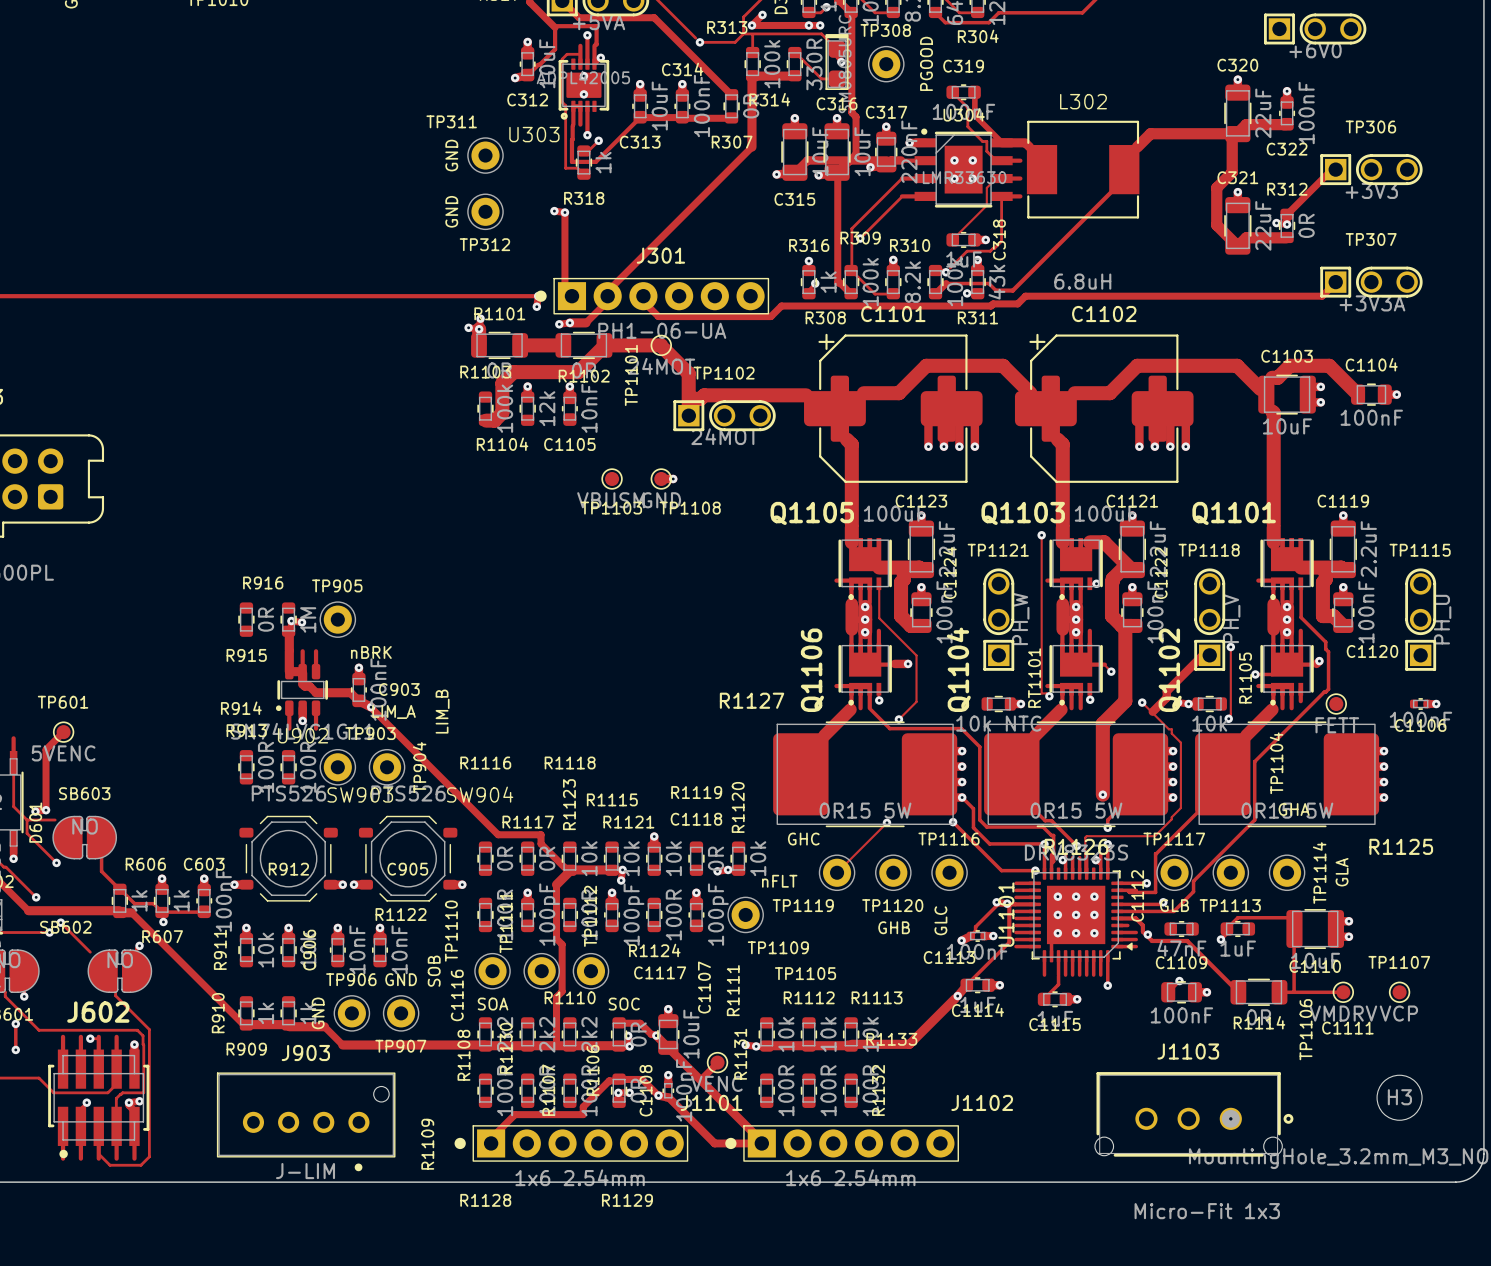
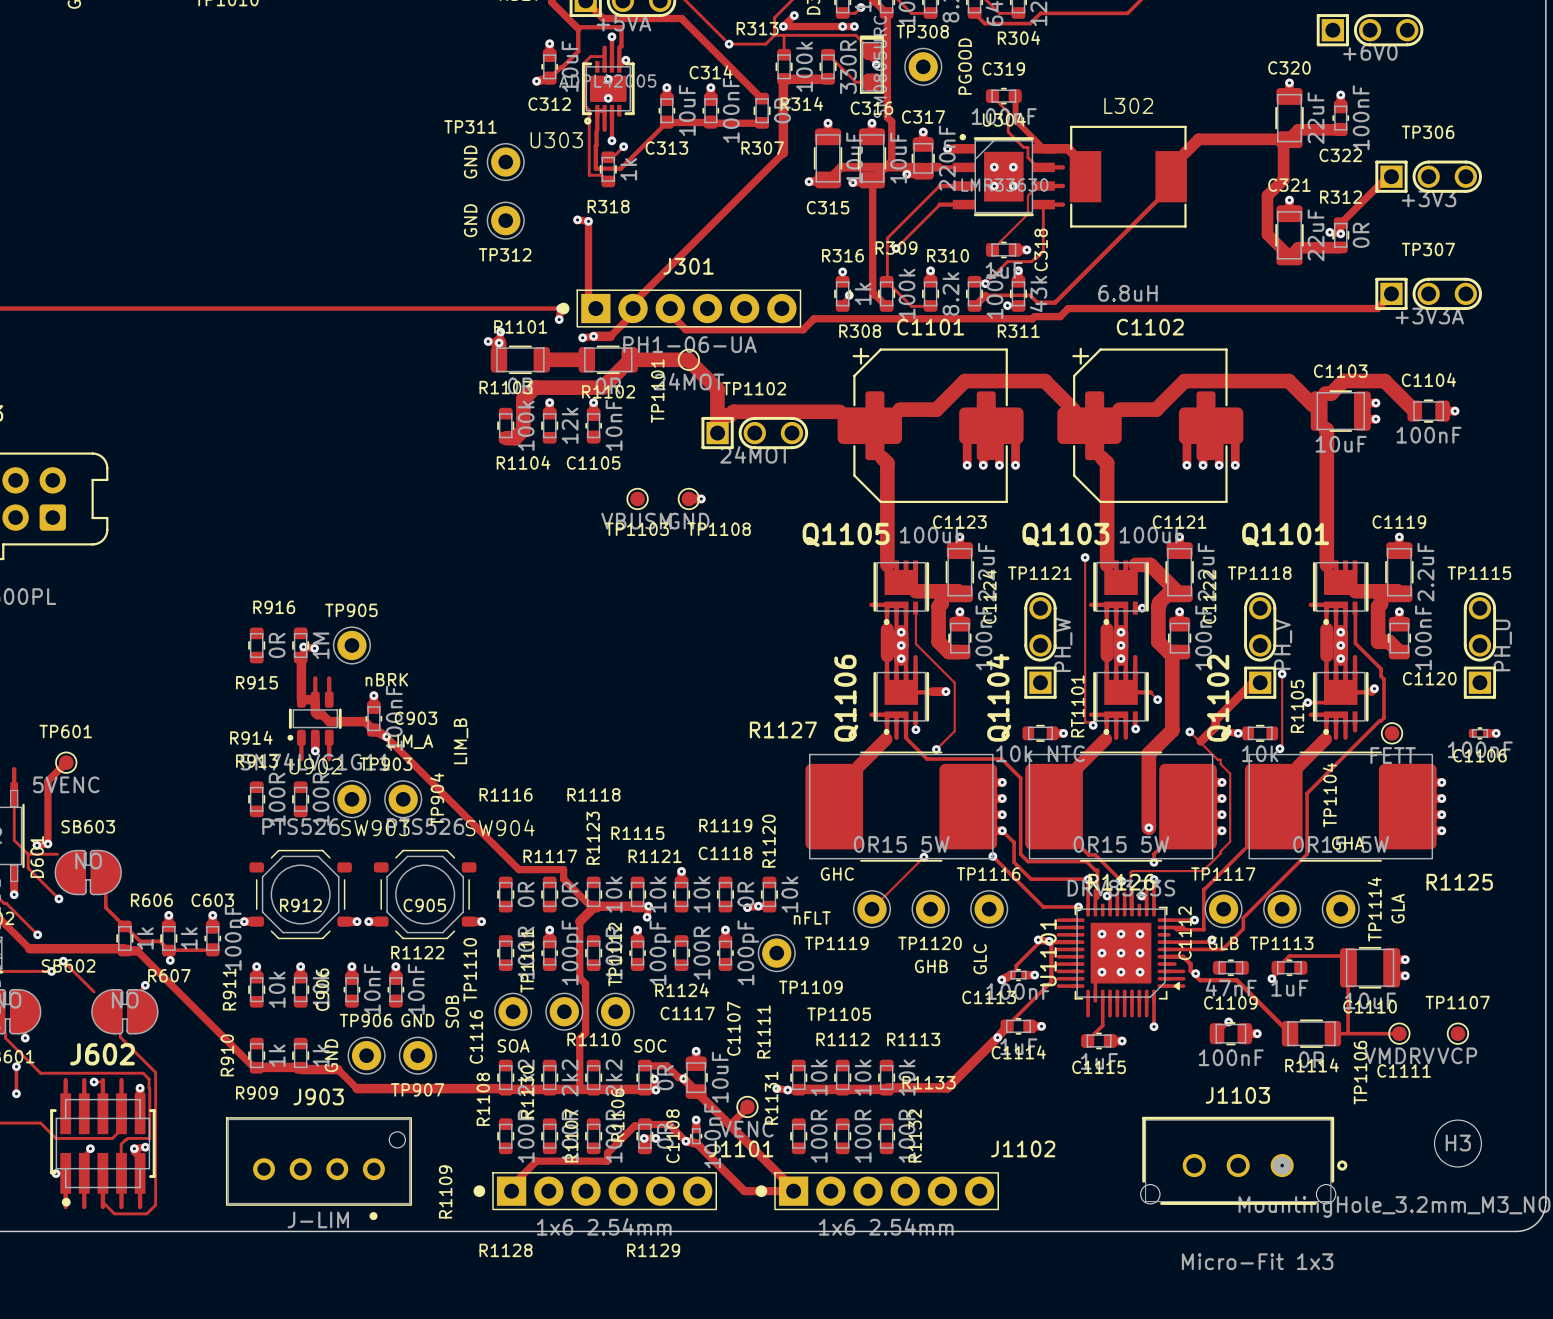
via: none -> (56, 1173)

